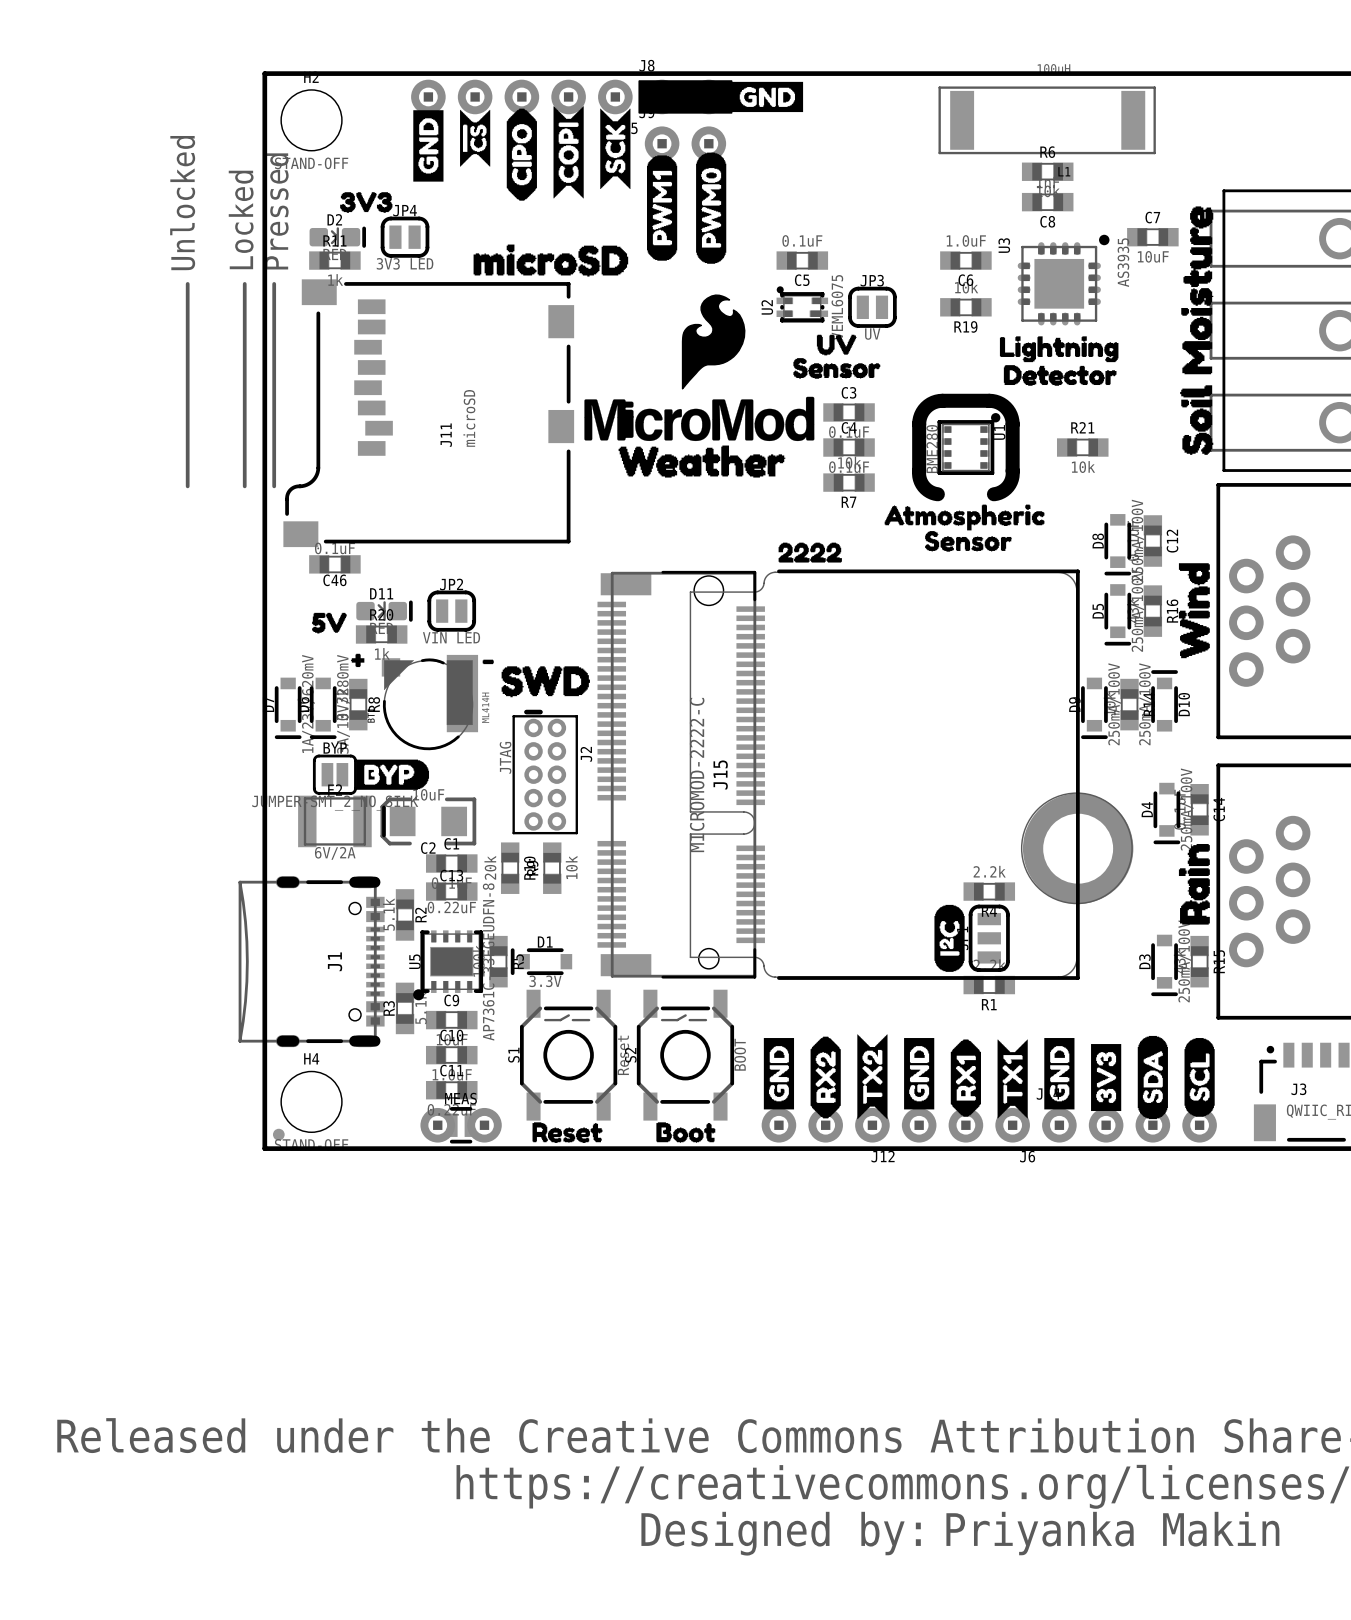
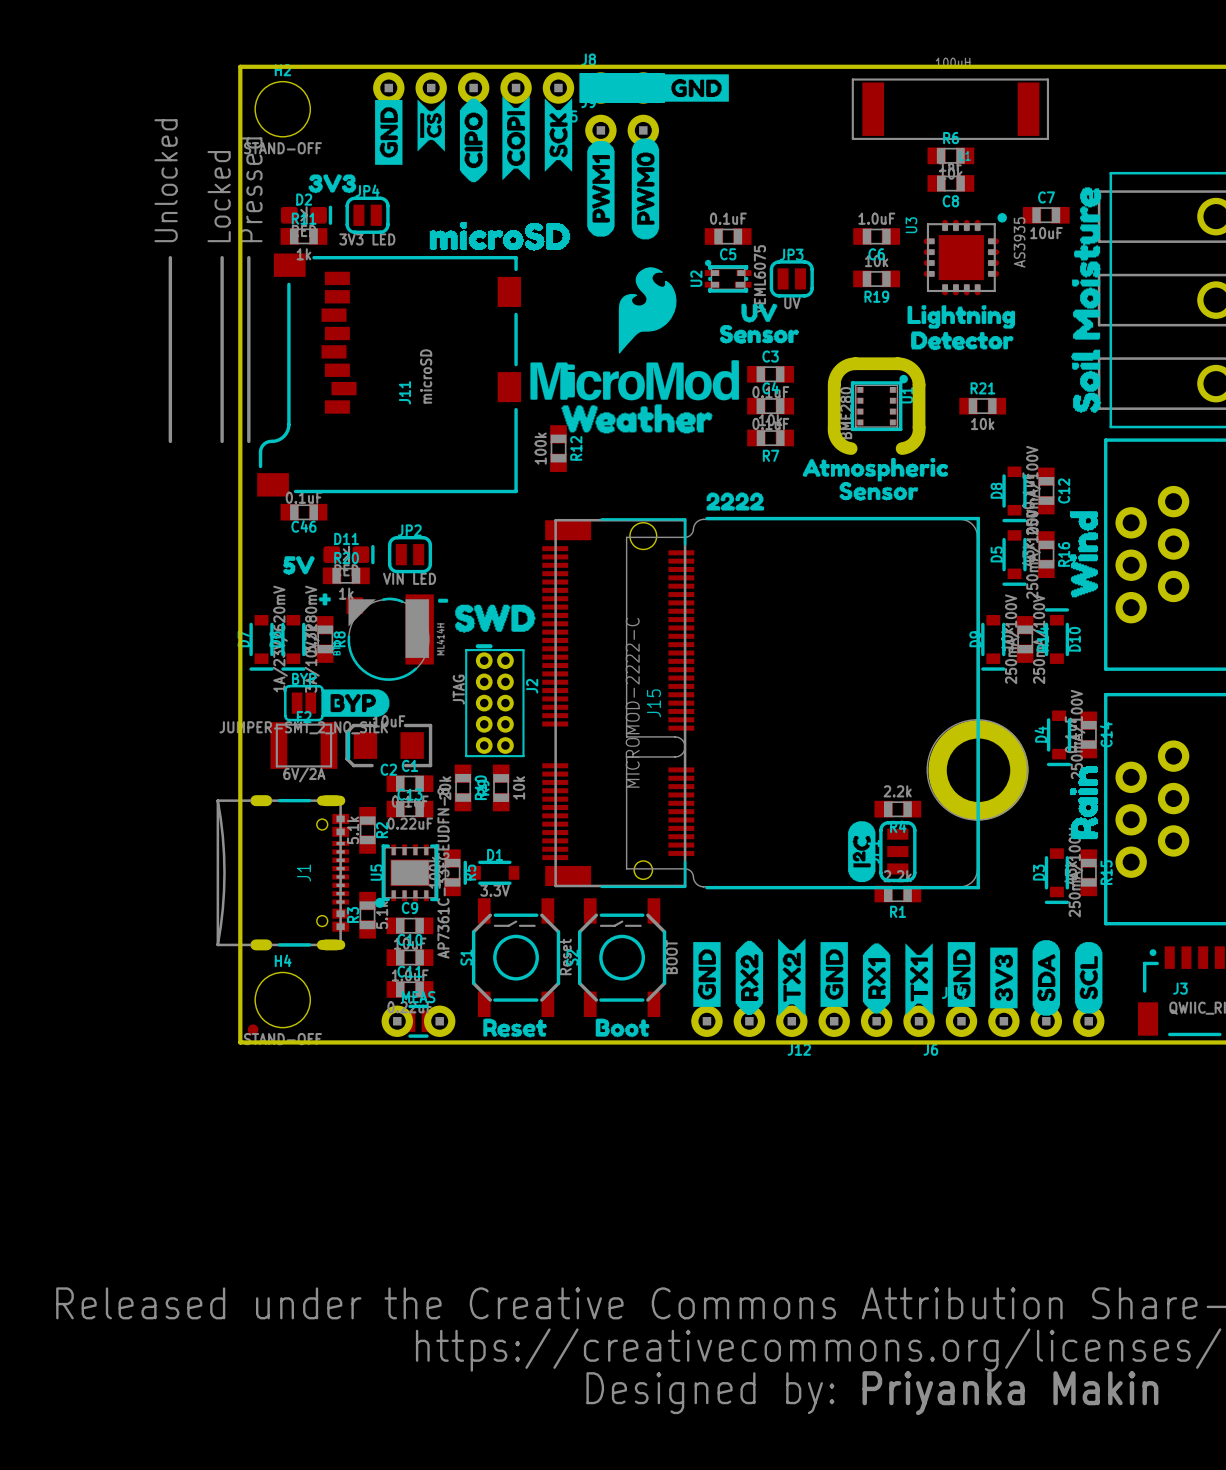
R12: none -> 100k (558, 448)

